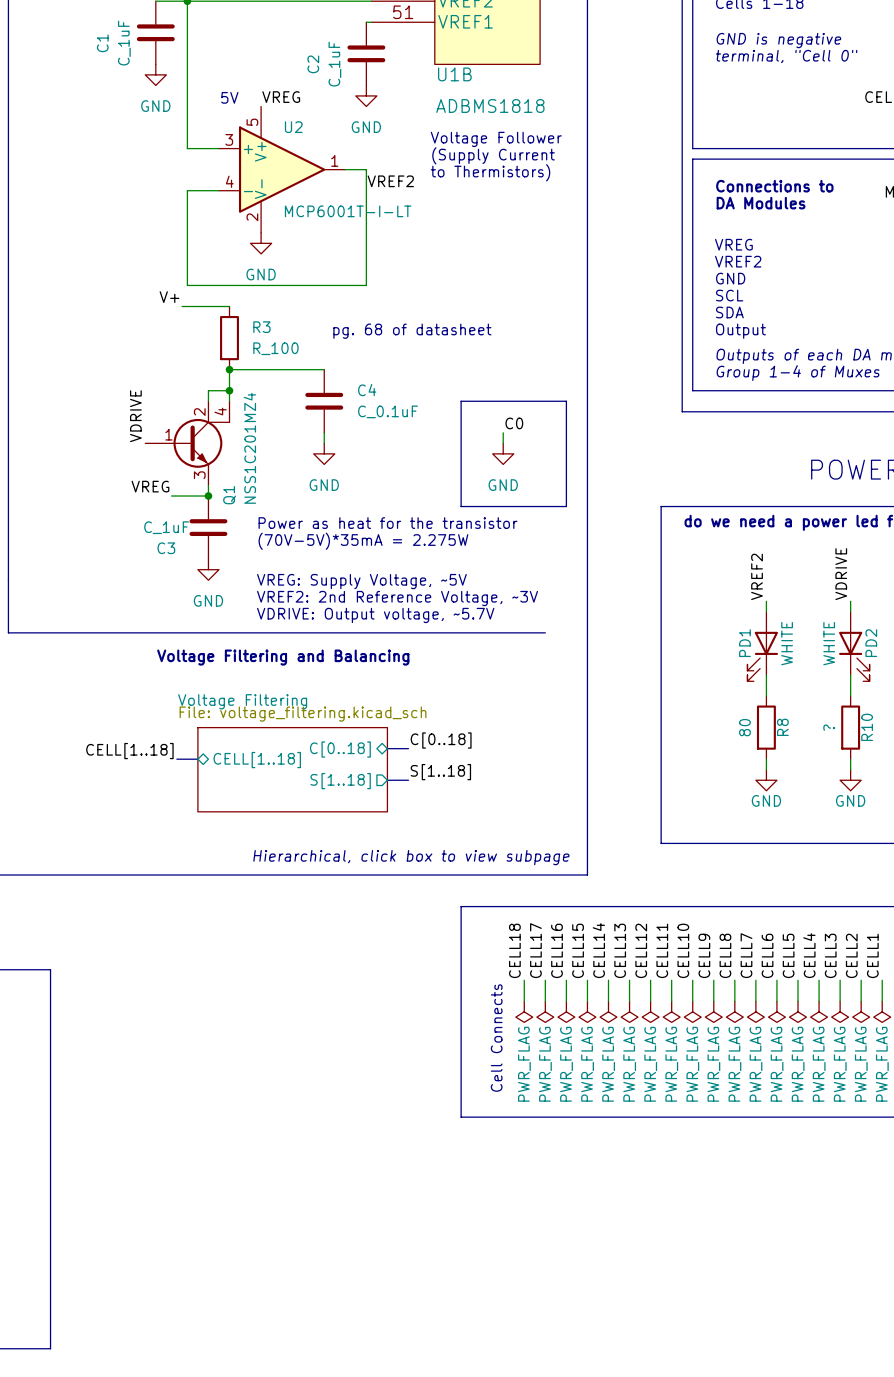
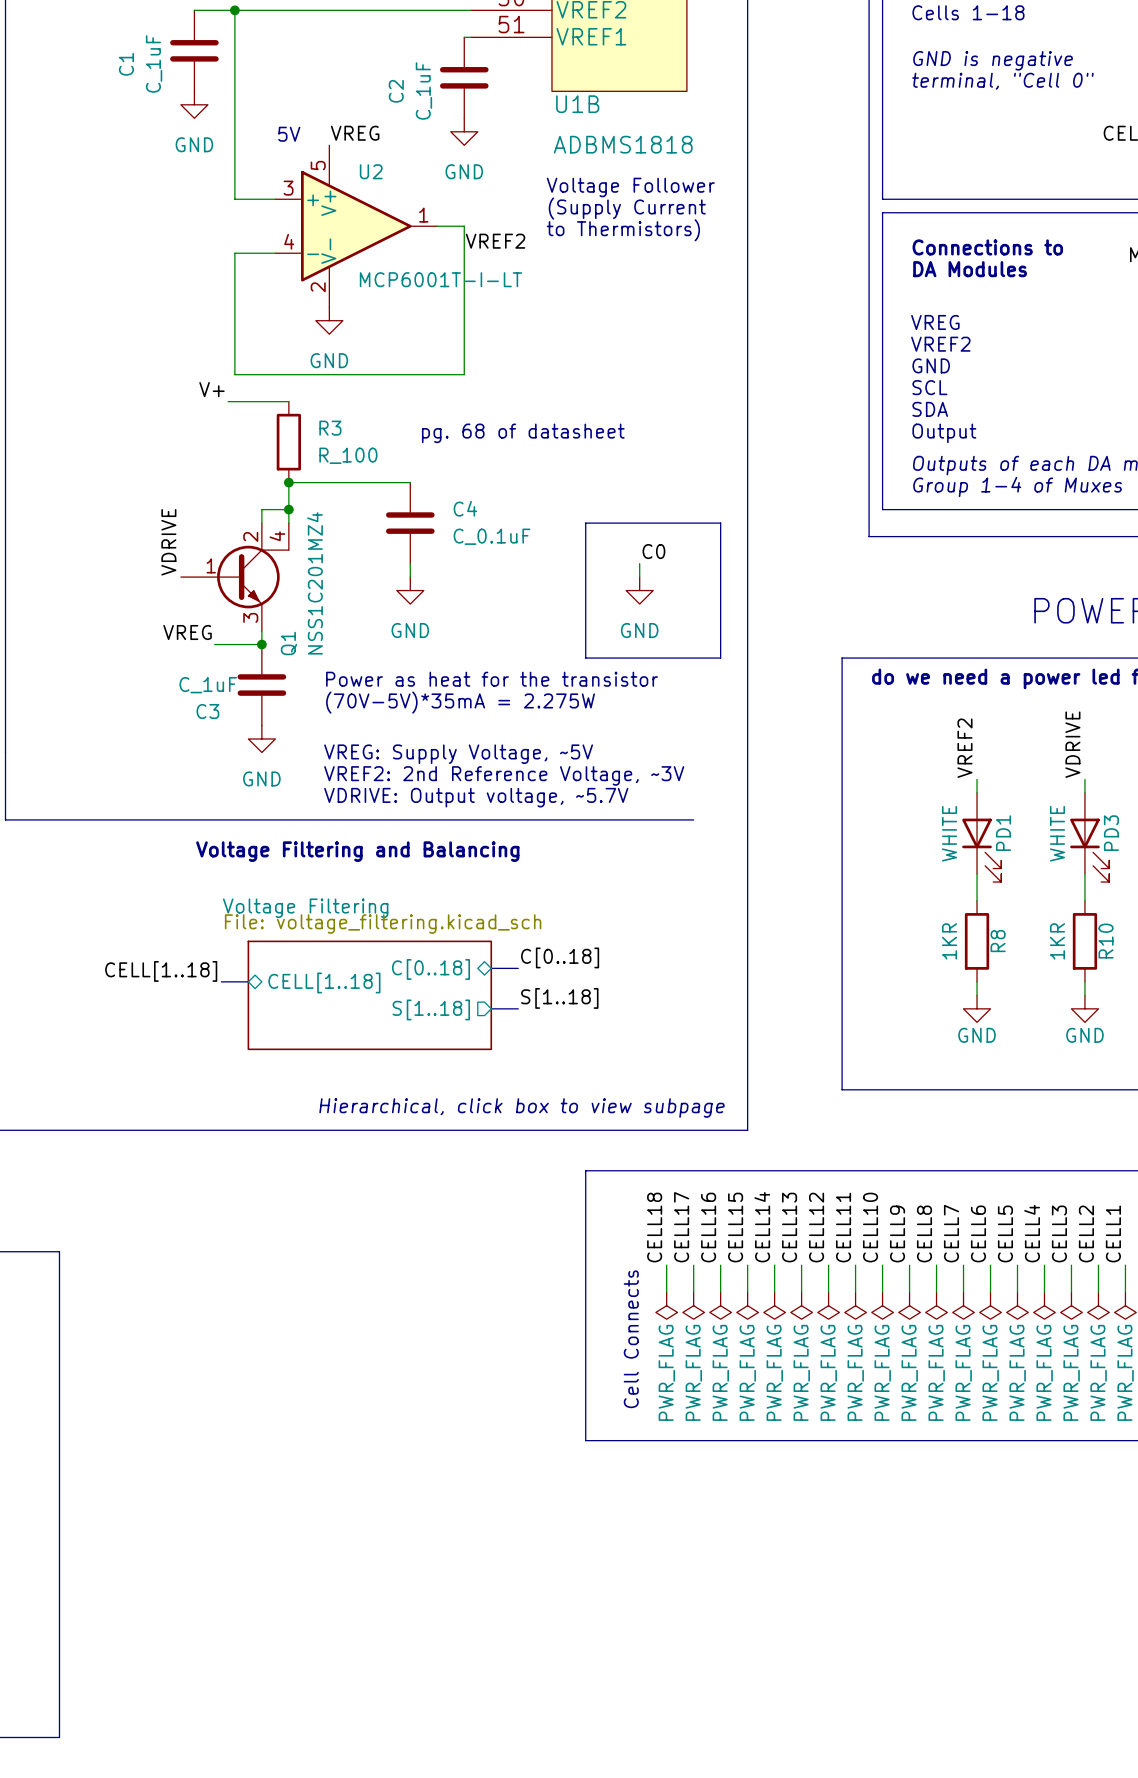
PD2 name: PD2 (871, 643) -> PD3 (1111, 833)
PD1 flip: as is (762, 656) -> left-right (981, 850)
R8 value: 80 (744, 727) -> 1KR (949, 941)
R10 value: ? (829, 727) -> 1KR (1057, 941)

